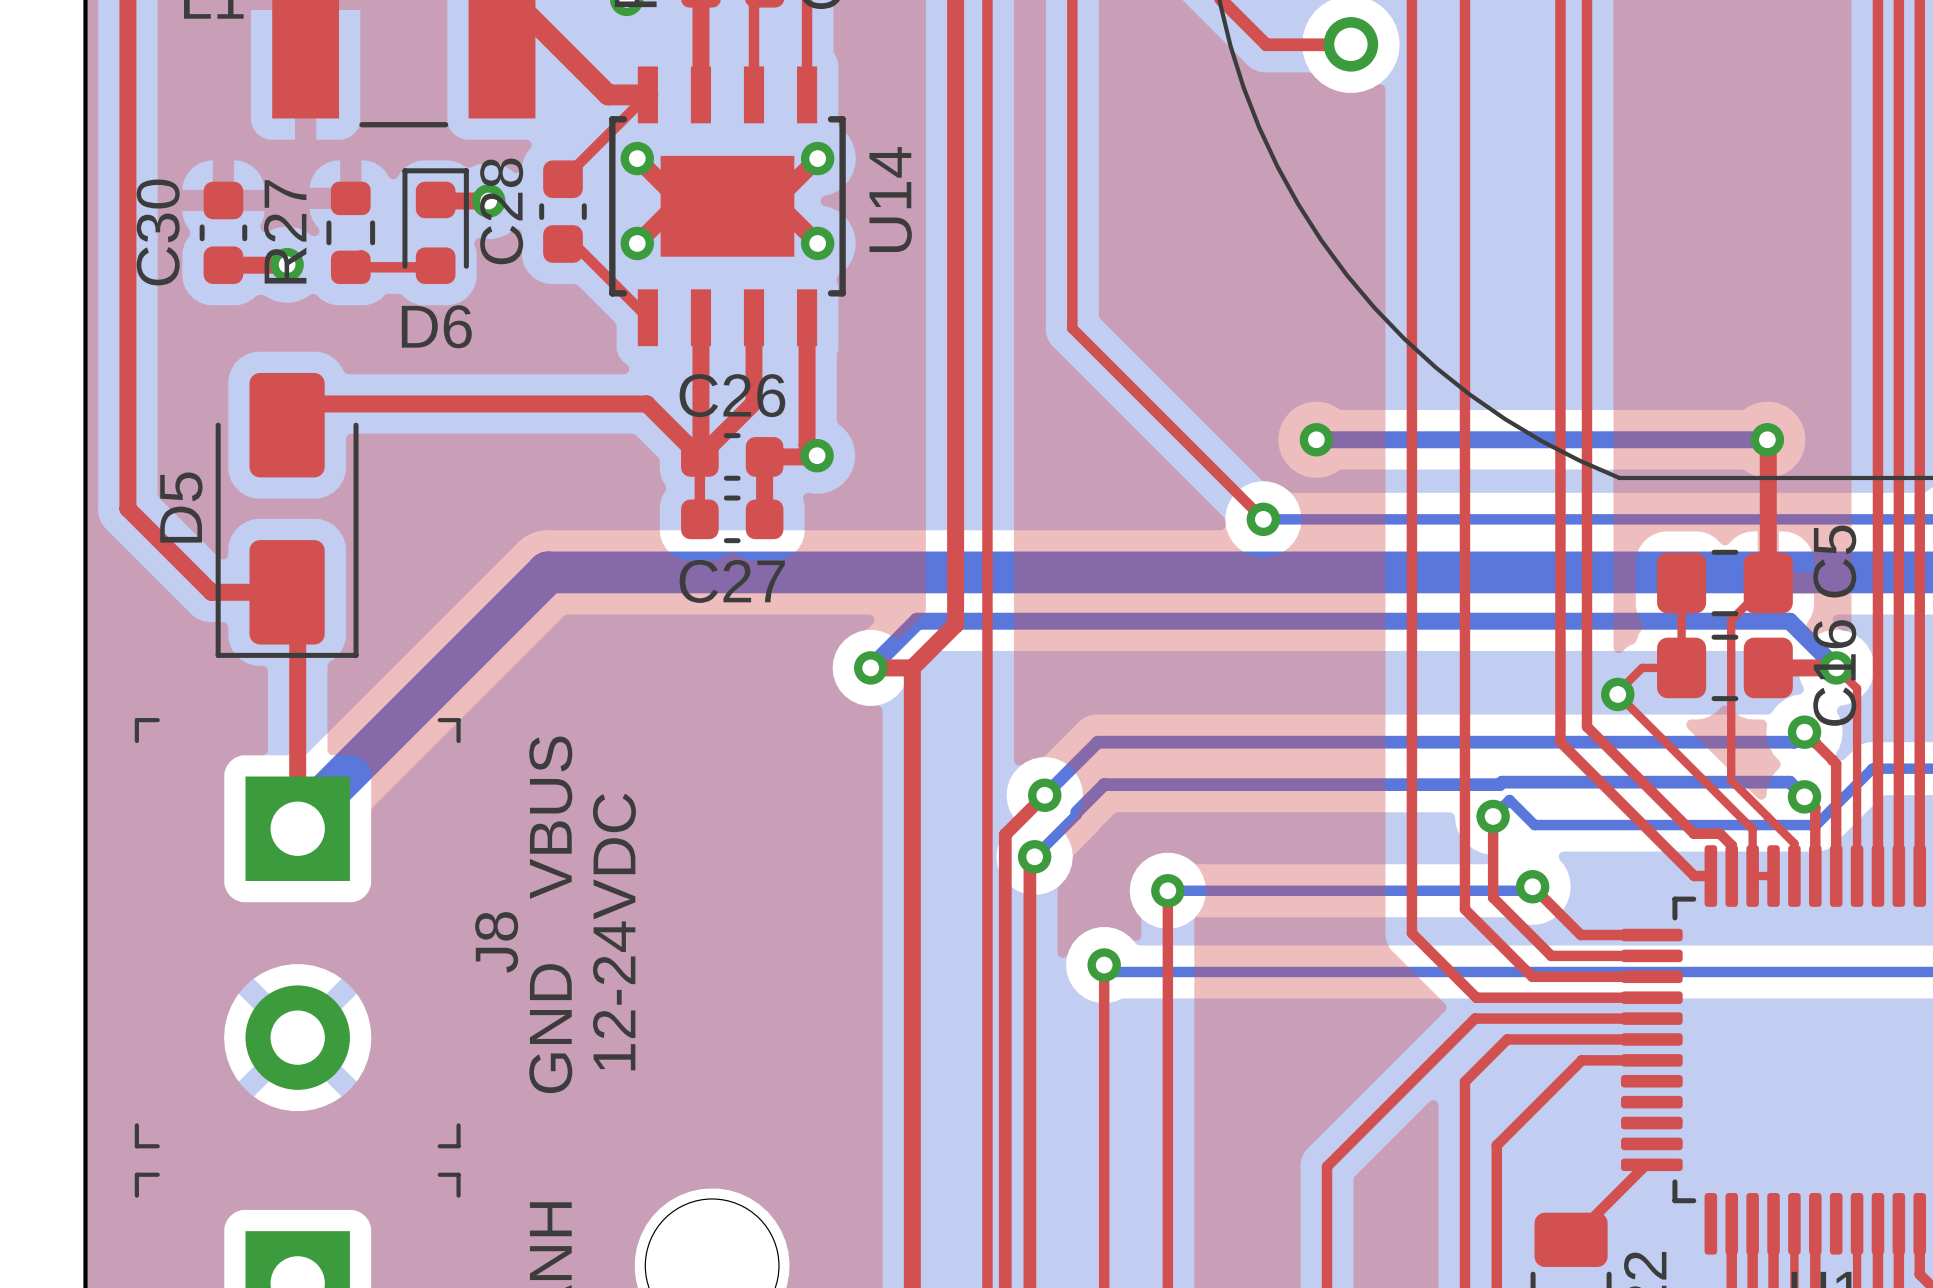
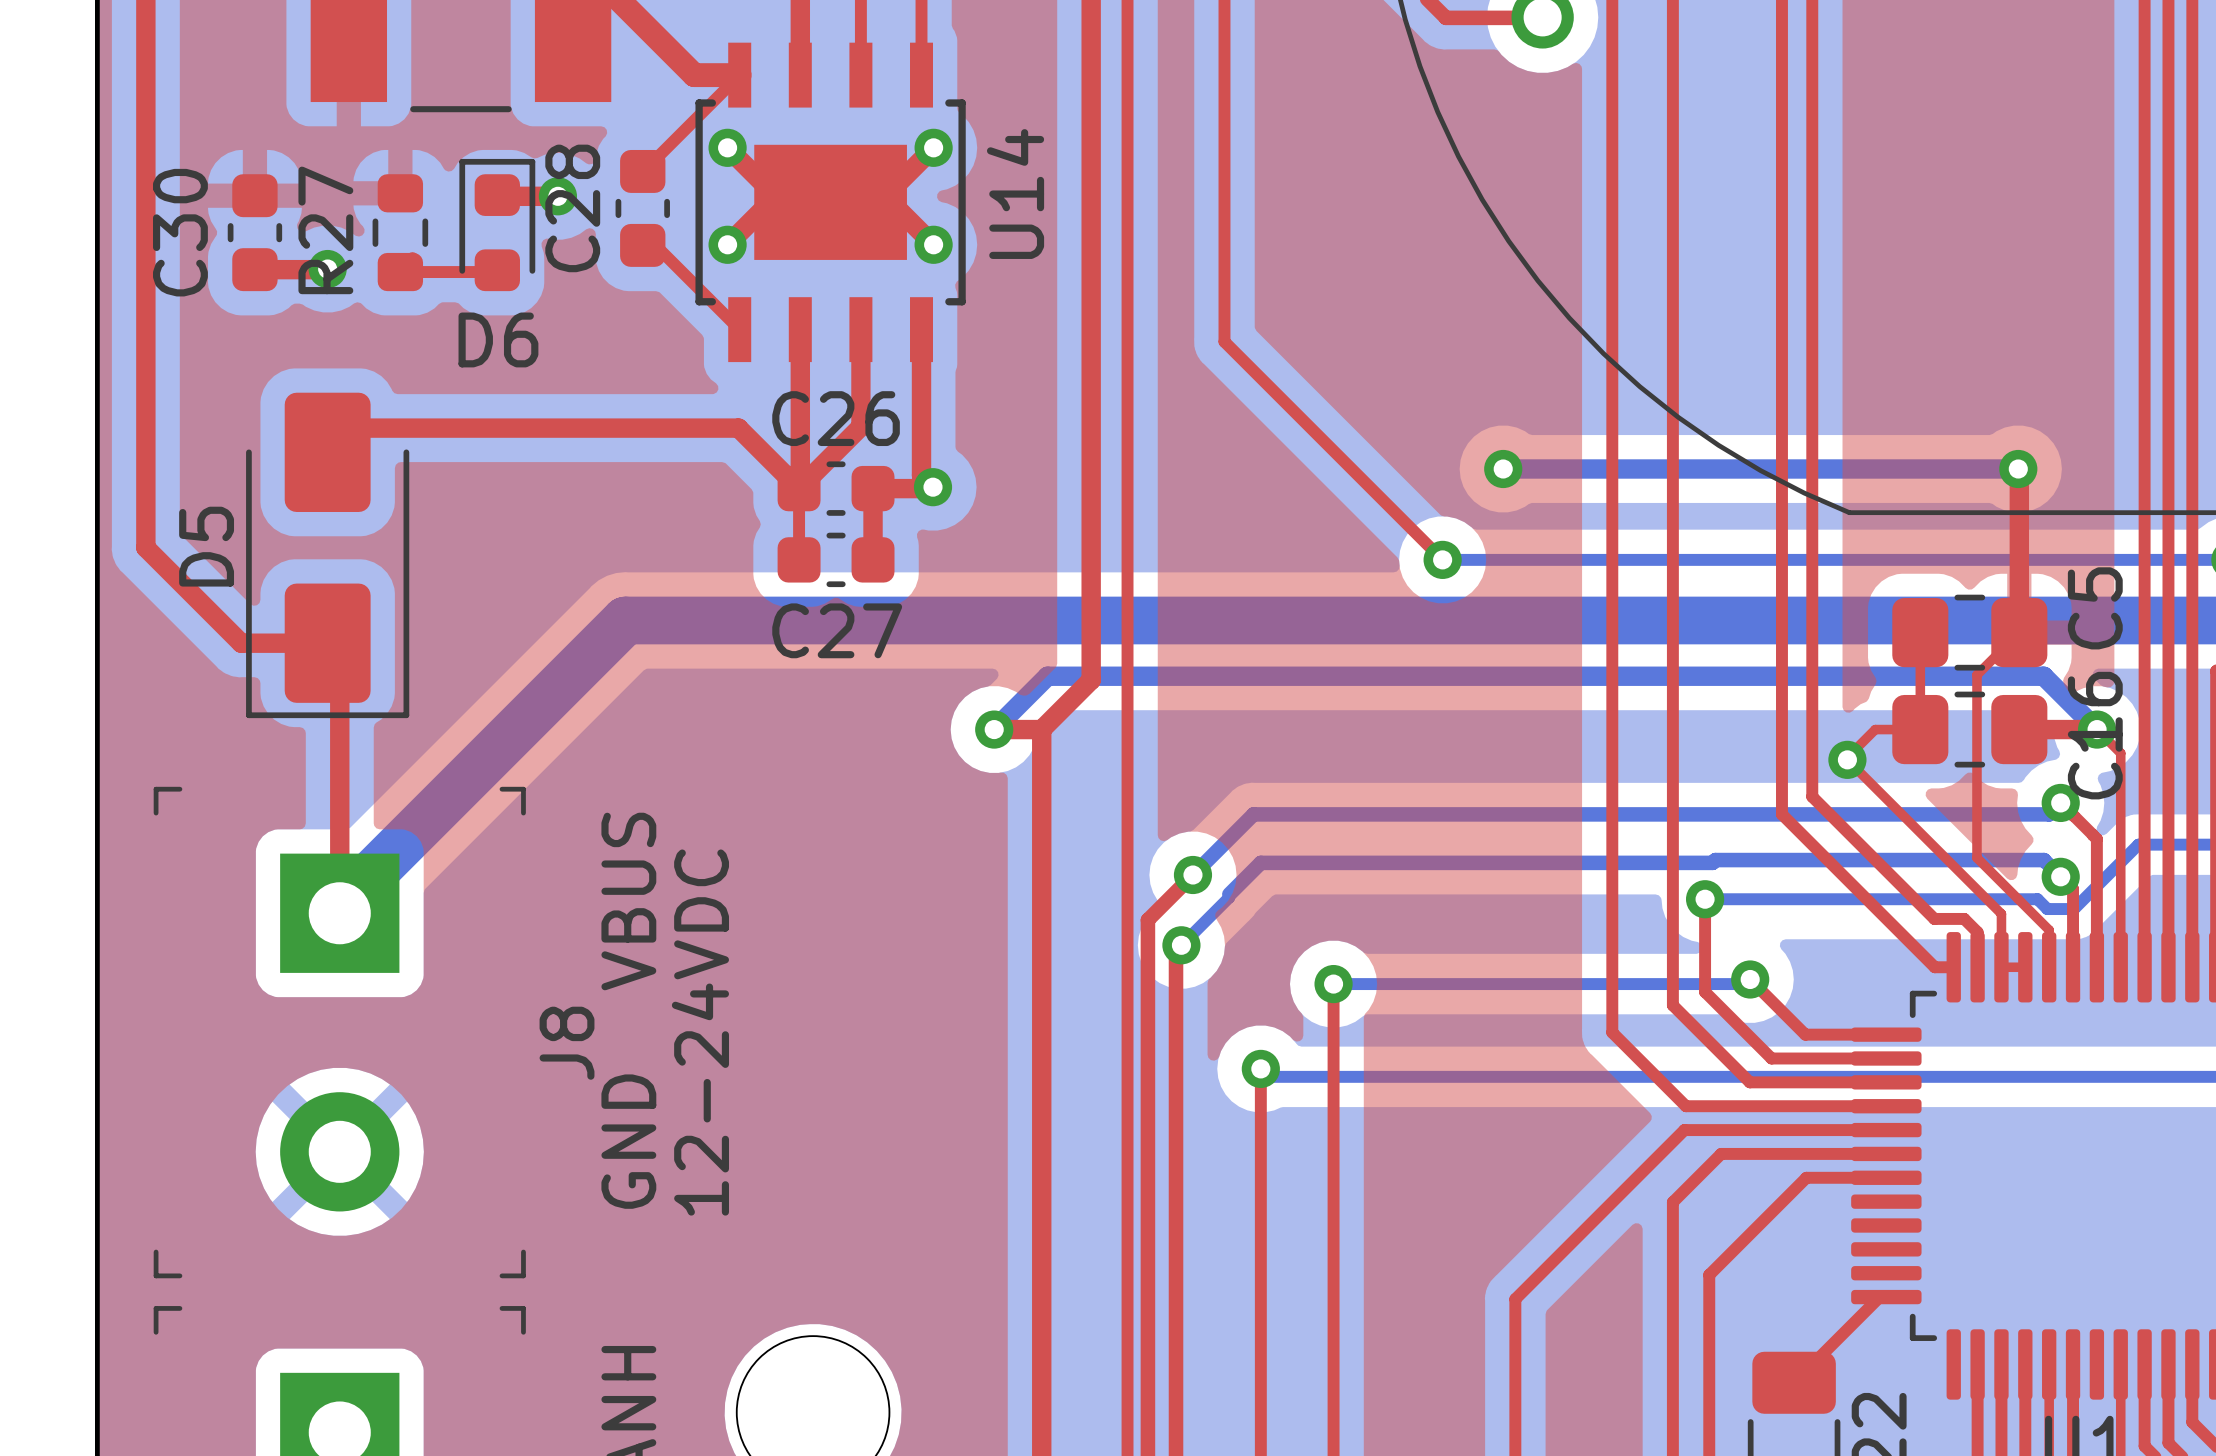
bottom track: (1493, 816) (1509, 800) (1534, 825) (1792, 825) -> (1705, 899) (2037, 899) (2047, 909)

